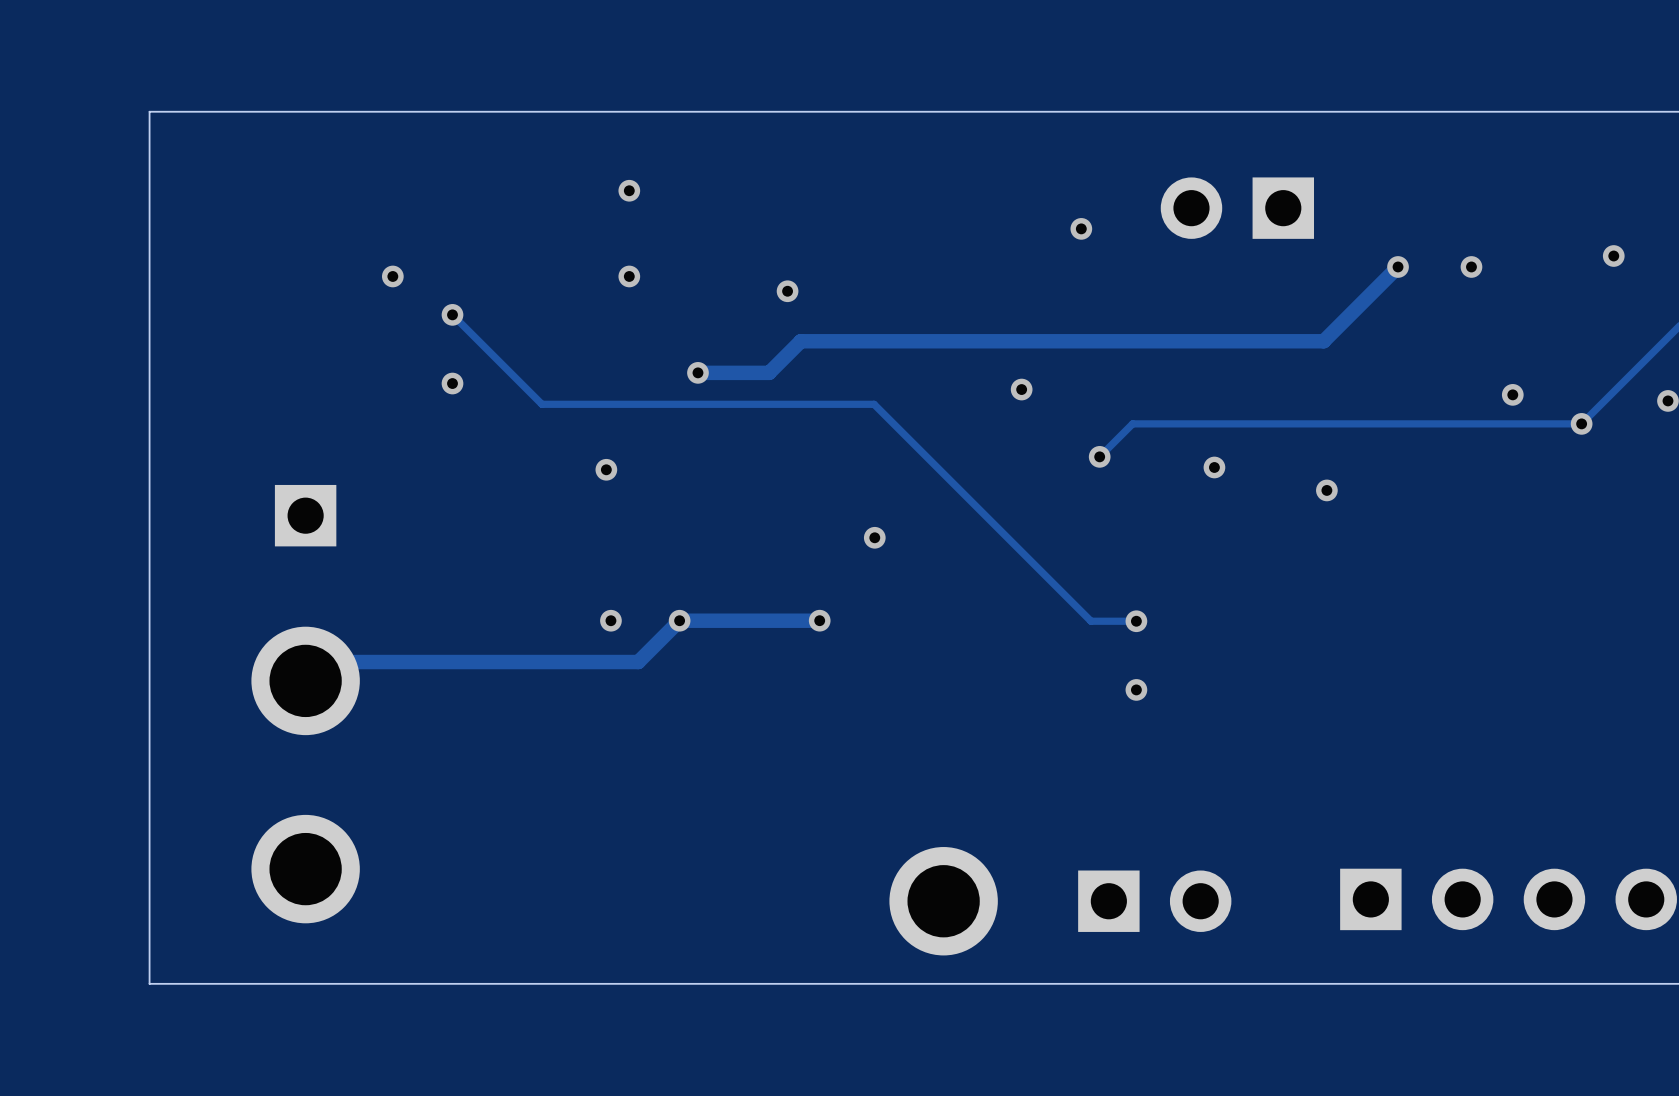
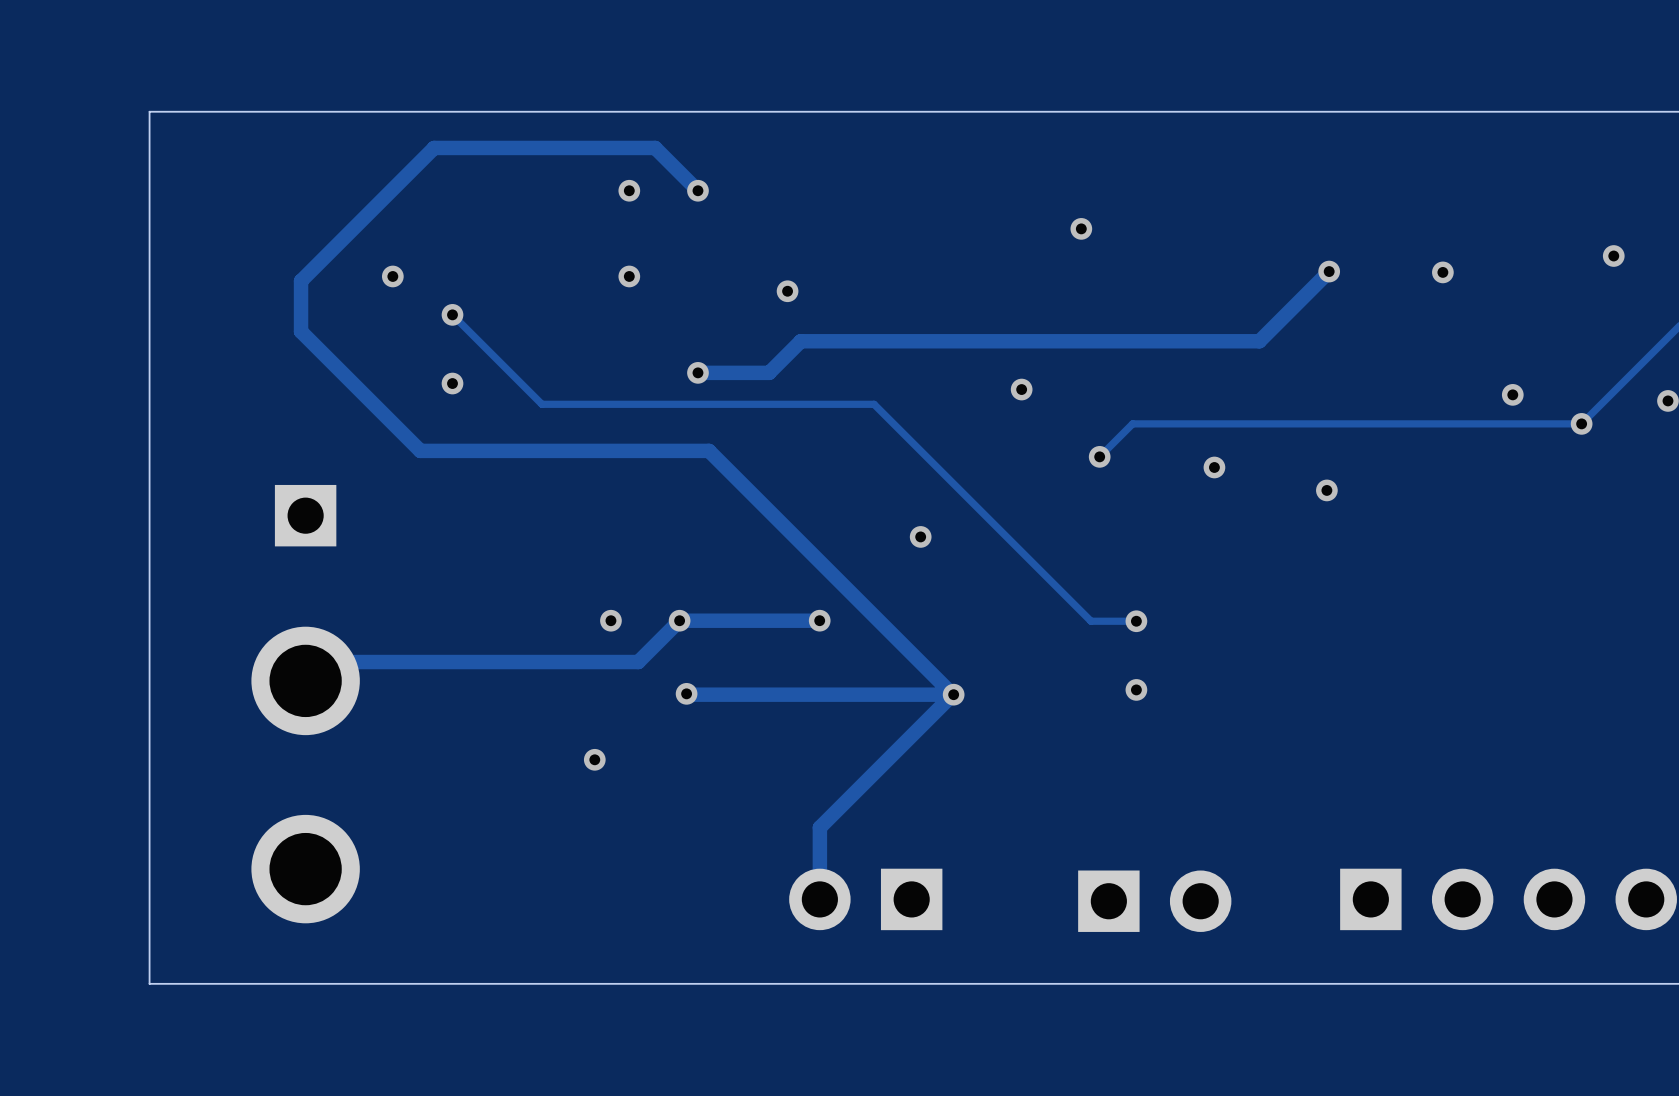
track: none -> (697, 190) (655, 147) (434, 147) (301, 281) (301, 331) (420, 450) (709, 450) (952, 694) (819, 827) (819, 899)
via: none -> (697, 190)
part position: (1237, 208) -> (865, 899)
track: (1398, 266) (1323, 341) (1259, 341) -> (1329, 271) (1259, 341)
via: (1398, 266) -> none
via: (1471, 266) -> none
via: none -> (1329, 271)
via: none -> (1442, 272)
via: (606, 469) -> none
via position: (874, 537) -> (920, 536)
track: none -> (686, 693) (953, 694)
via: none -> (686, 693)
via: none -> (953, 694)
via: none -> (594, 759)
part: (943, 901) -> none

